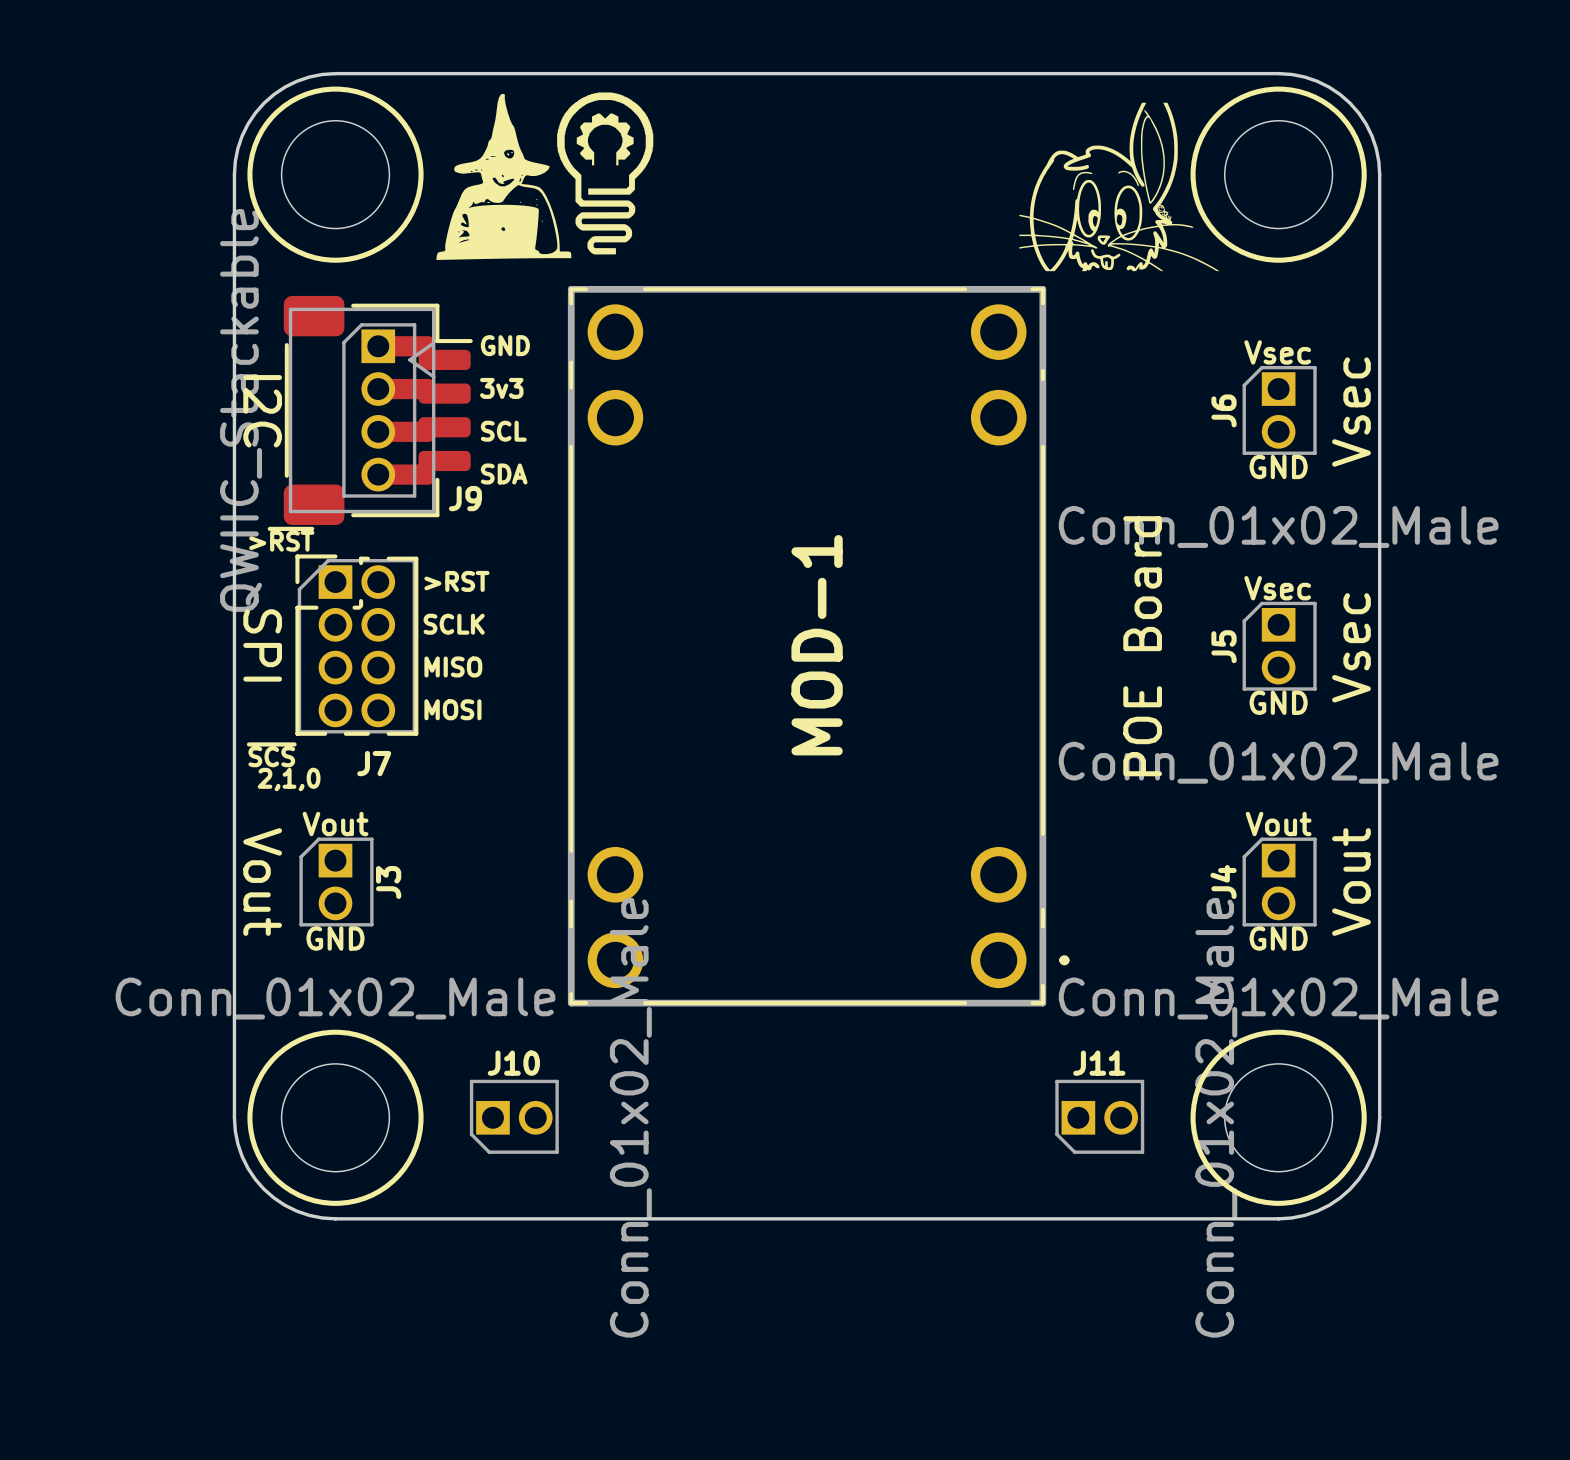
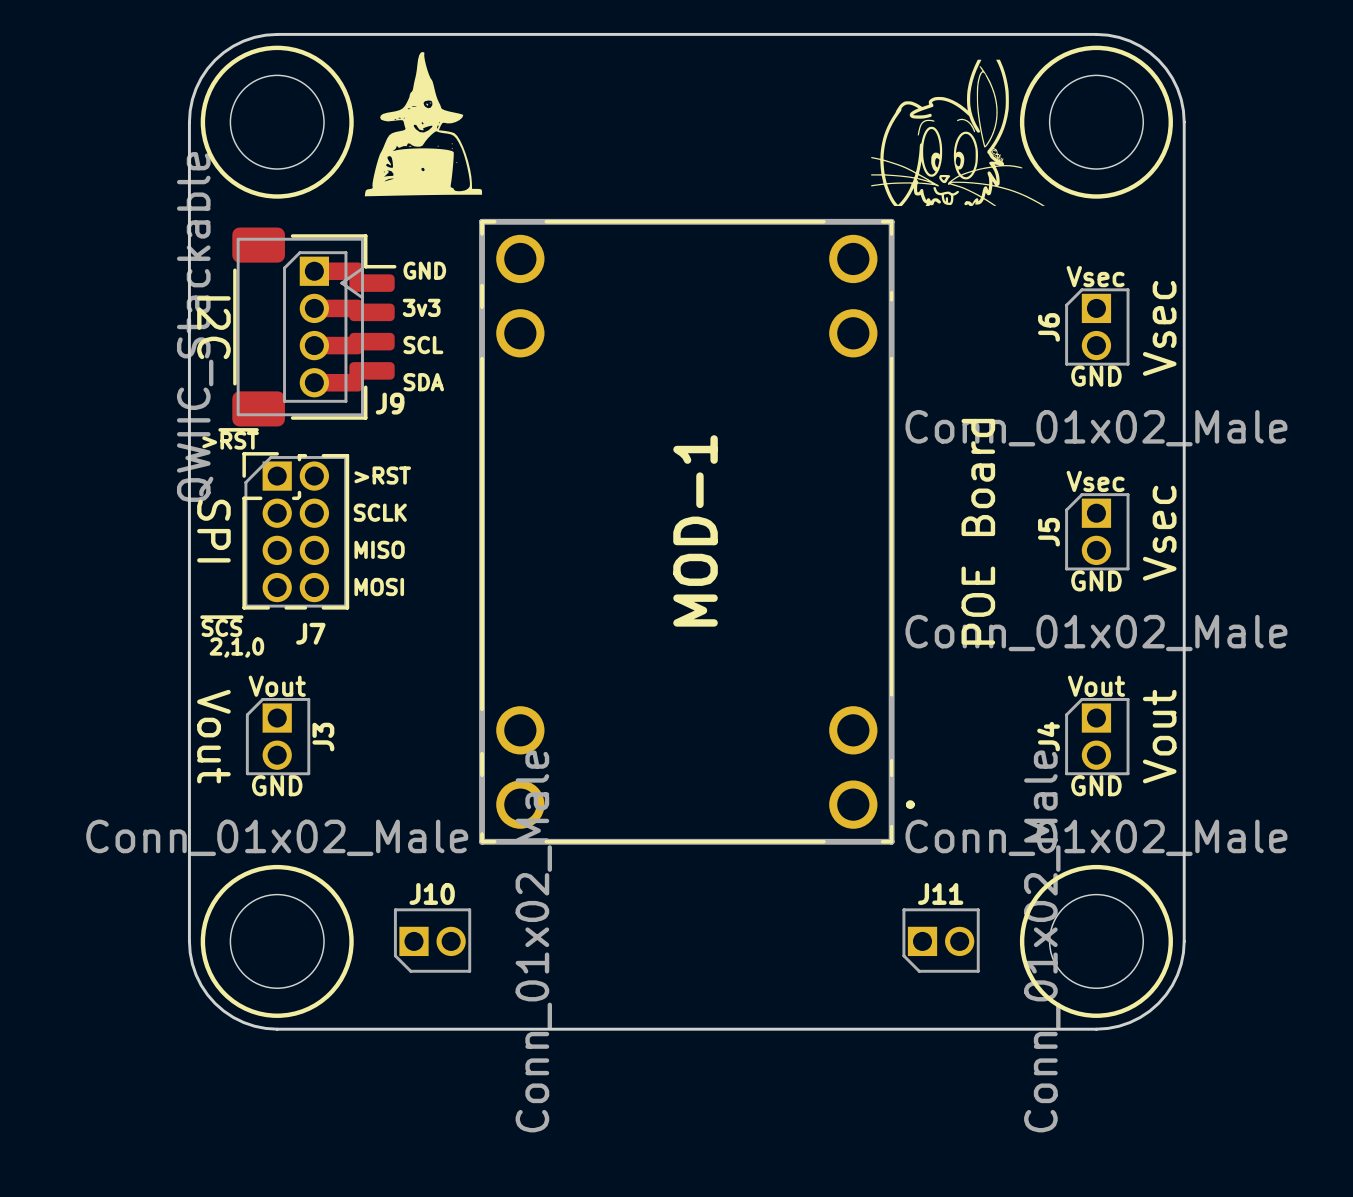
drawing: [557, 92, 654, 255] -> none

